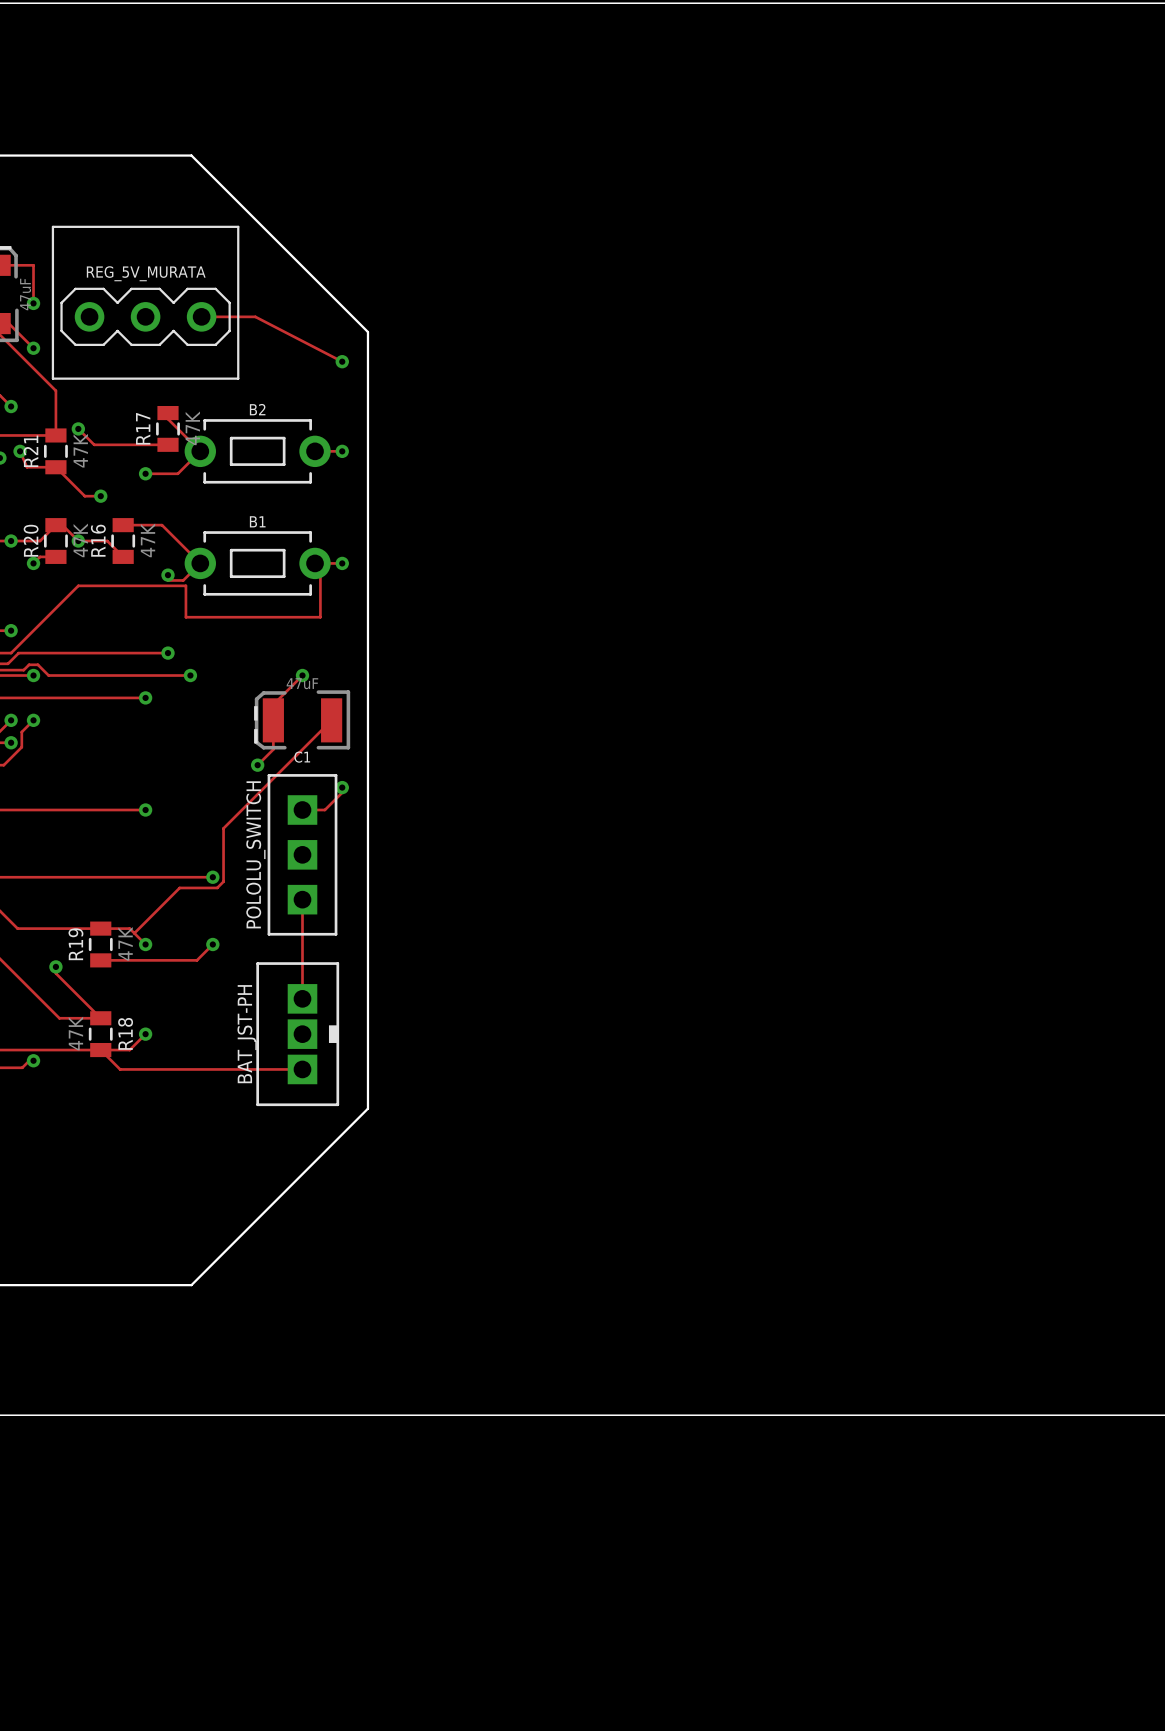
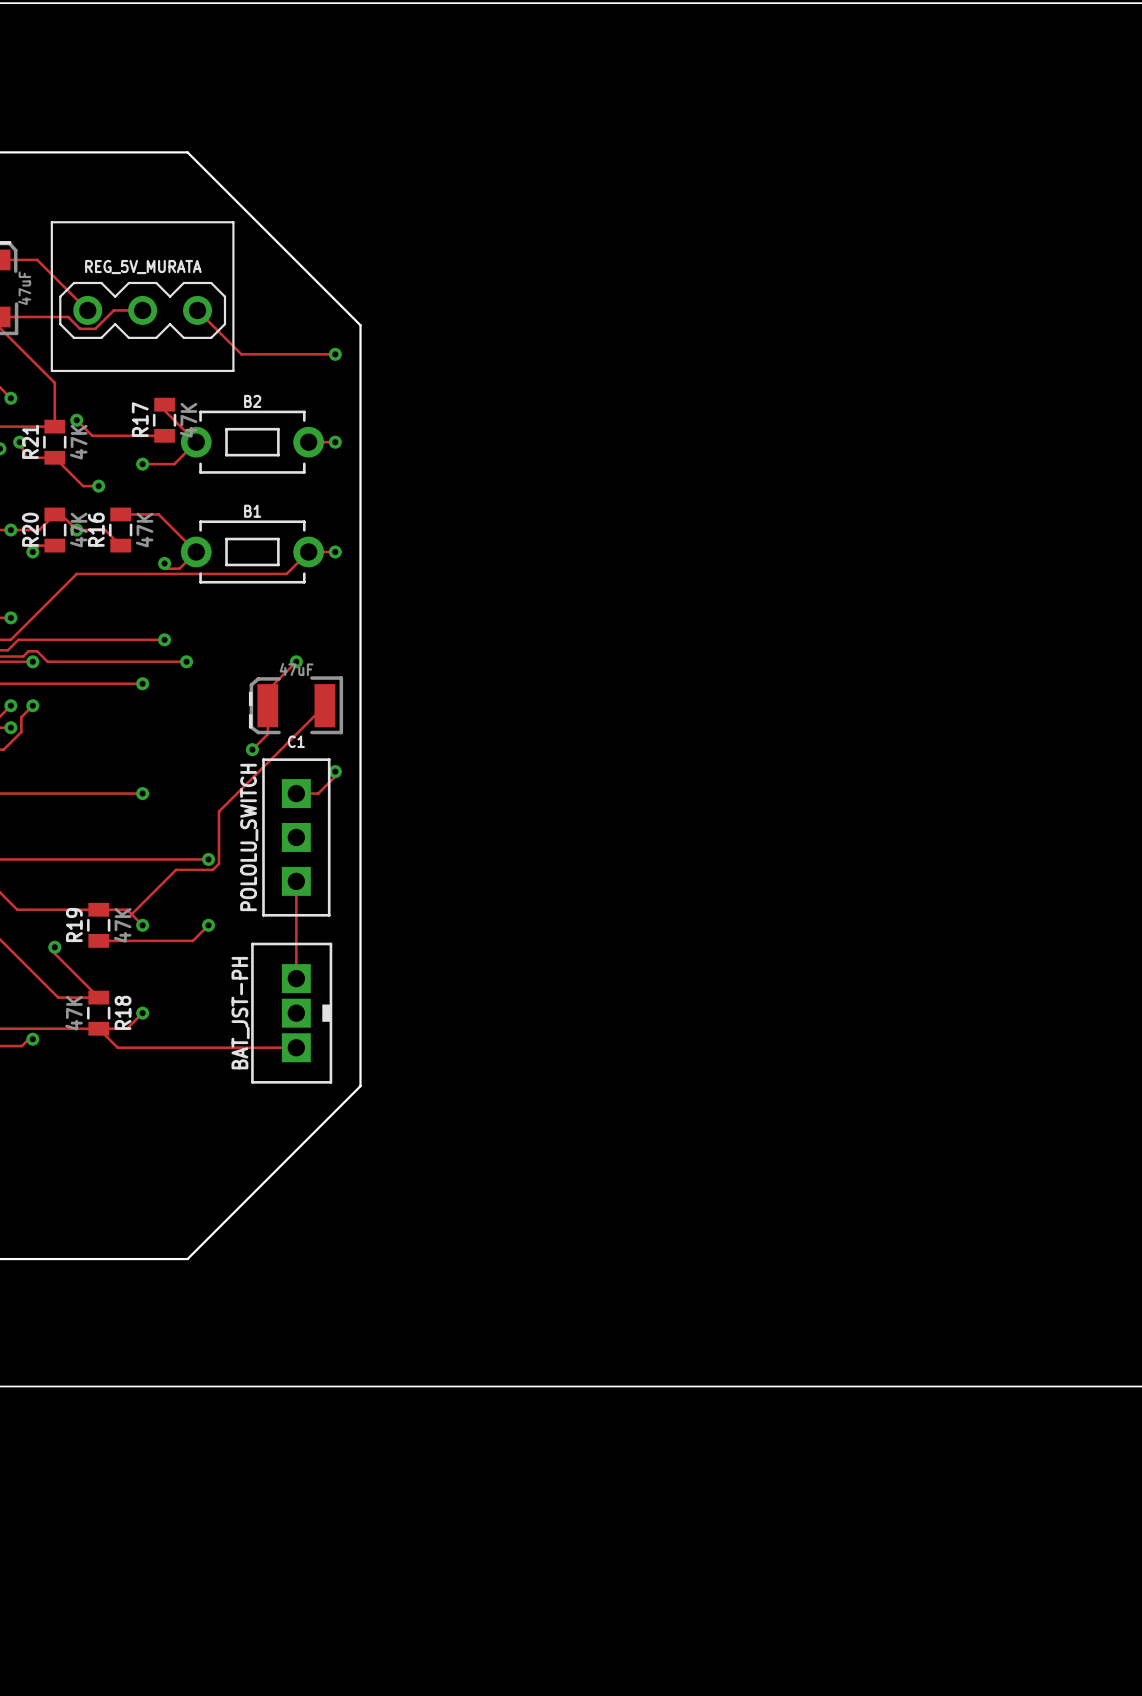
track: (33, 265) (33, 303) -> (32, 259) (37, 259) (87, 310)
via: (33, 303) -> none
track: (201, 316) (255, 316) (342, 361) -> (197, 310) (241, 354) (335, 354)
track: (8, 323) (33, 348) -> (8, 317) (68, 317) (80, 328) (95, 328) (113, 310) (142, 310)
via: (33, 348) -> none
track: (315, 563) (320, 568) (320, 617) (185, 617) (185, 585) -> (308, 551) (286, 573) (182, 573)

